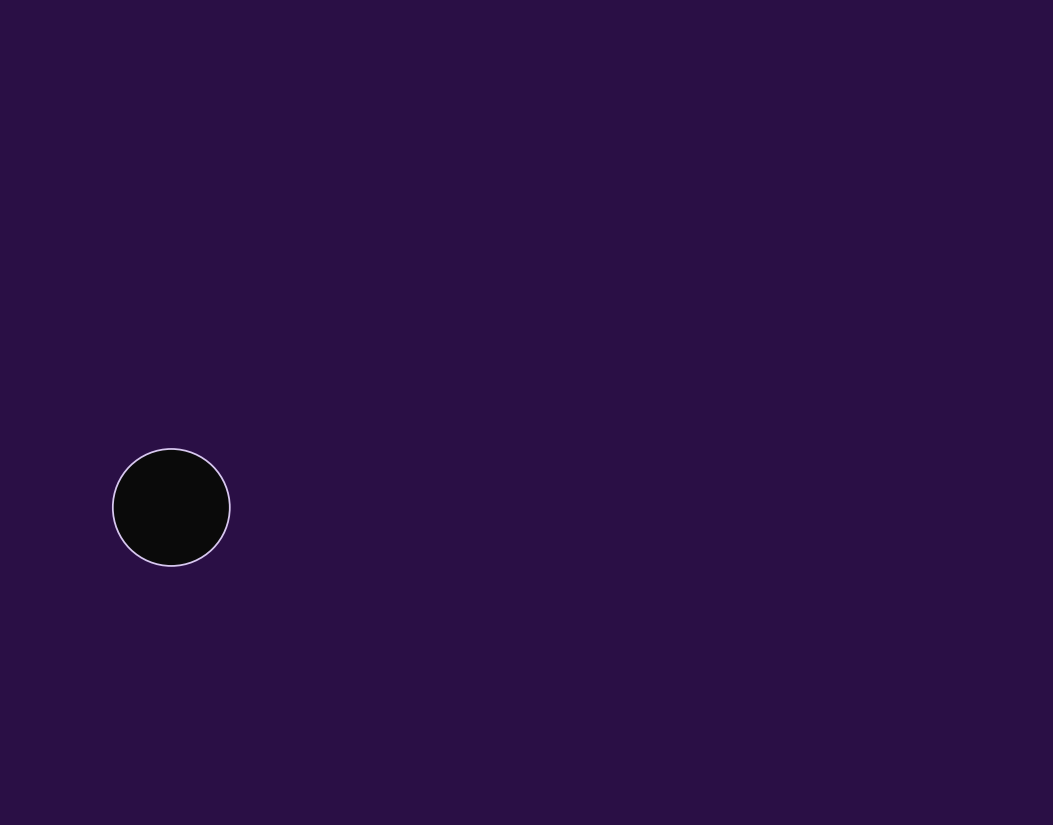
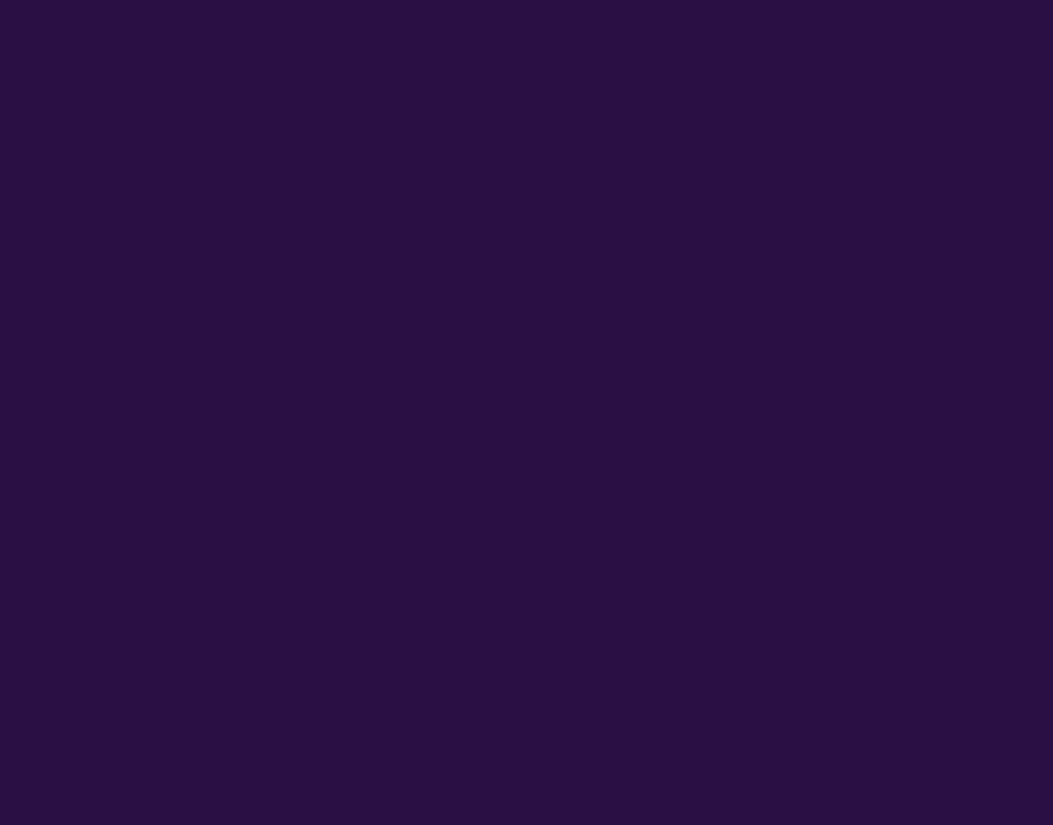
part: (171, 507) -> none

